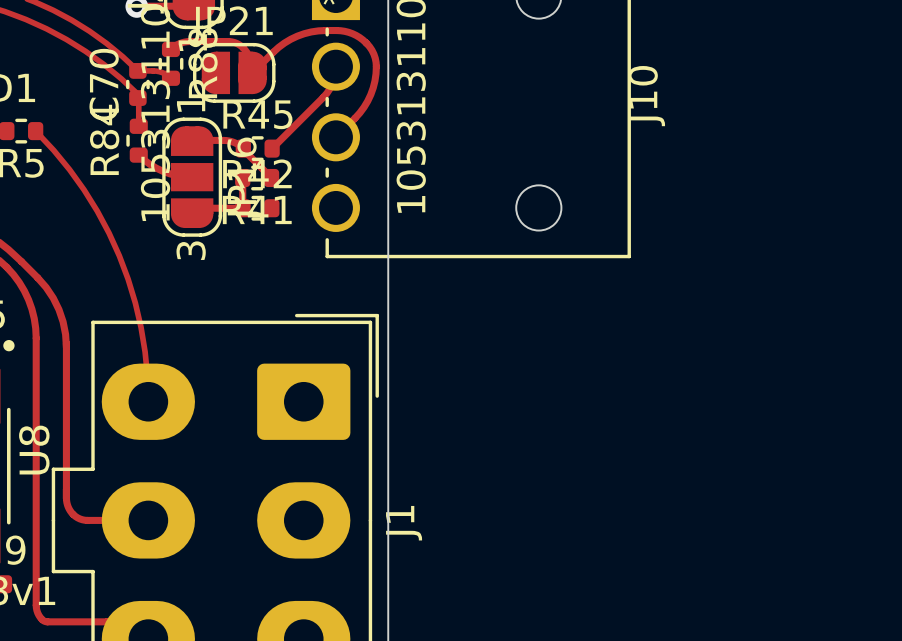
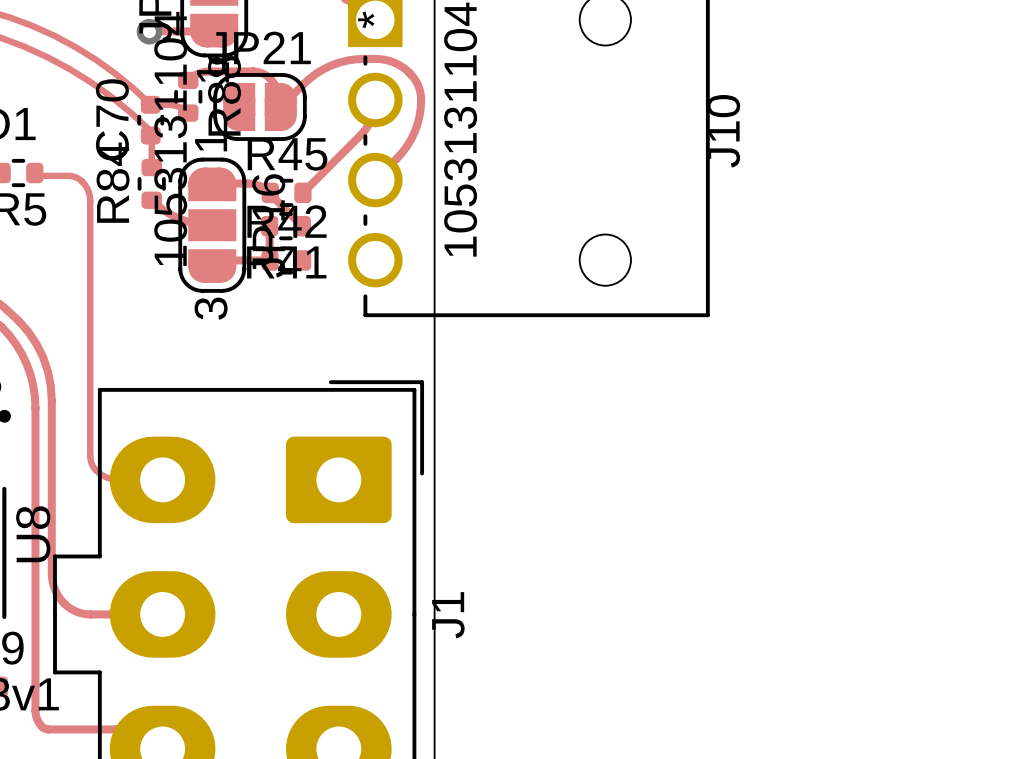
track: (36, 132) (69, 169) (84, 189) (109, 233) (119, 255) (135, 303) (141, 327) (147, 376) (148, 401) -> (34, 173) (40, 175) (75, 177) (84, 183) (89, 195) (90, 455) (91, 463) (99, 473) (110, 478) (162, 479)
track: (21, 261) (46, 287) (53, 298) (63, 321) (66, 347) -> (18, 321) (28, 332) (43, 357) (50, 385) (51, 573) (53, 585) (58, 597) (69, 608) (79, 612) (93, 614)
track: (66, 343) (66, 498) -> none
track: (66, 498) (68, 506) (73, 514) (79, 518) (87, 520) -> none

